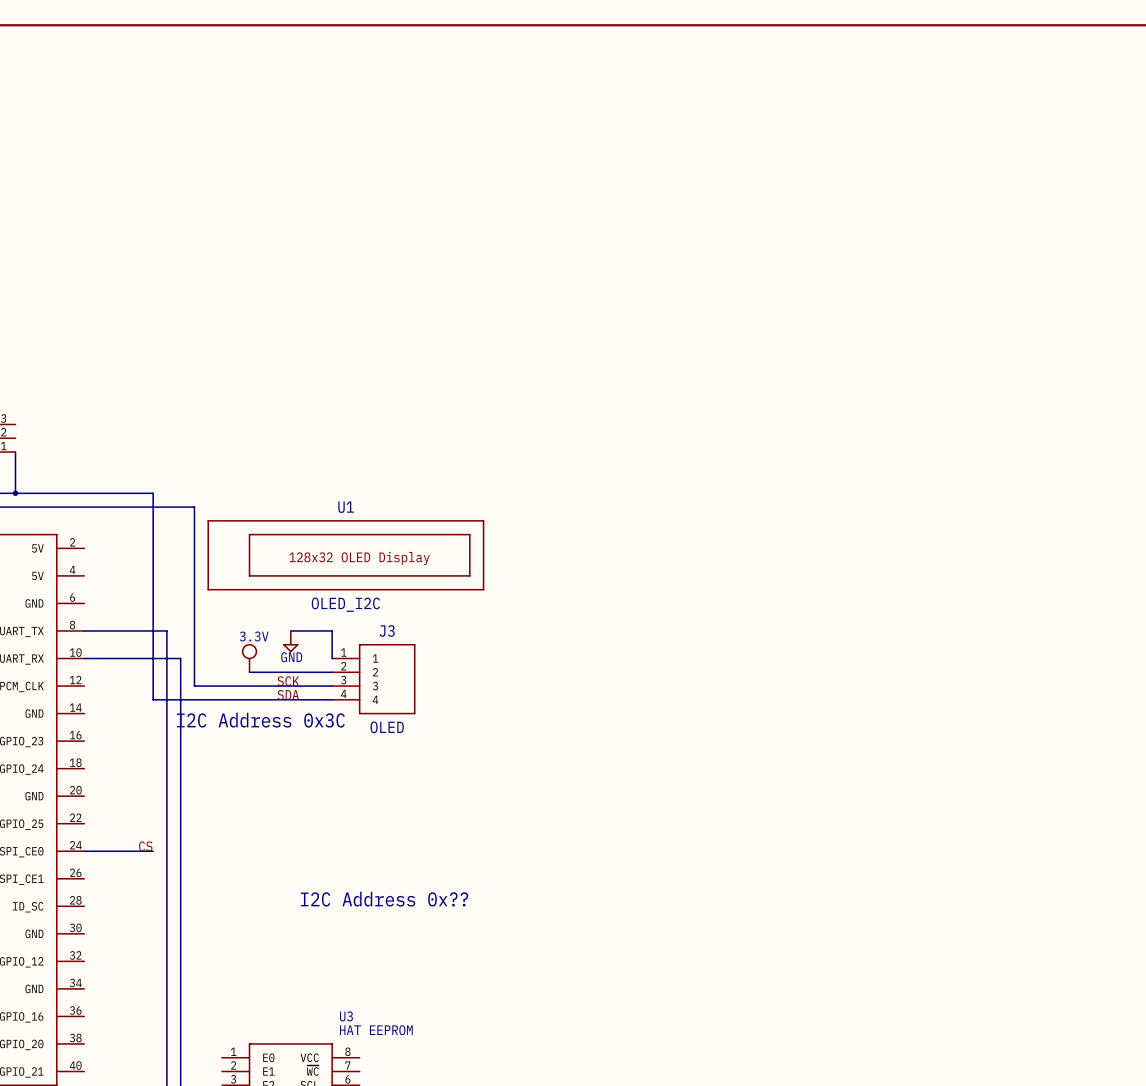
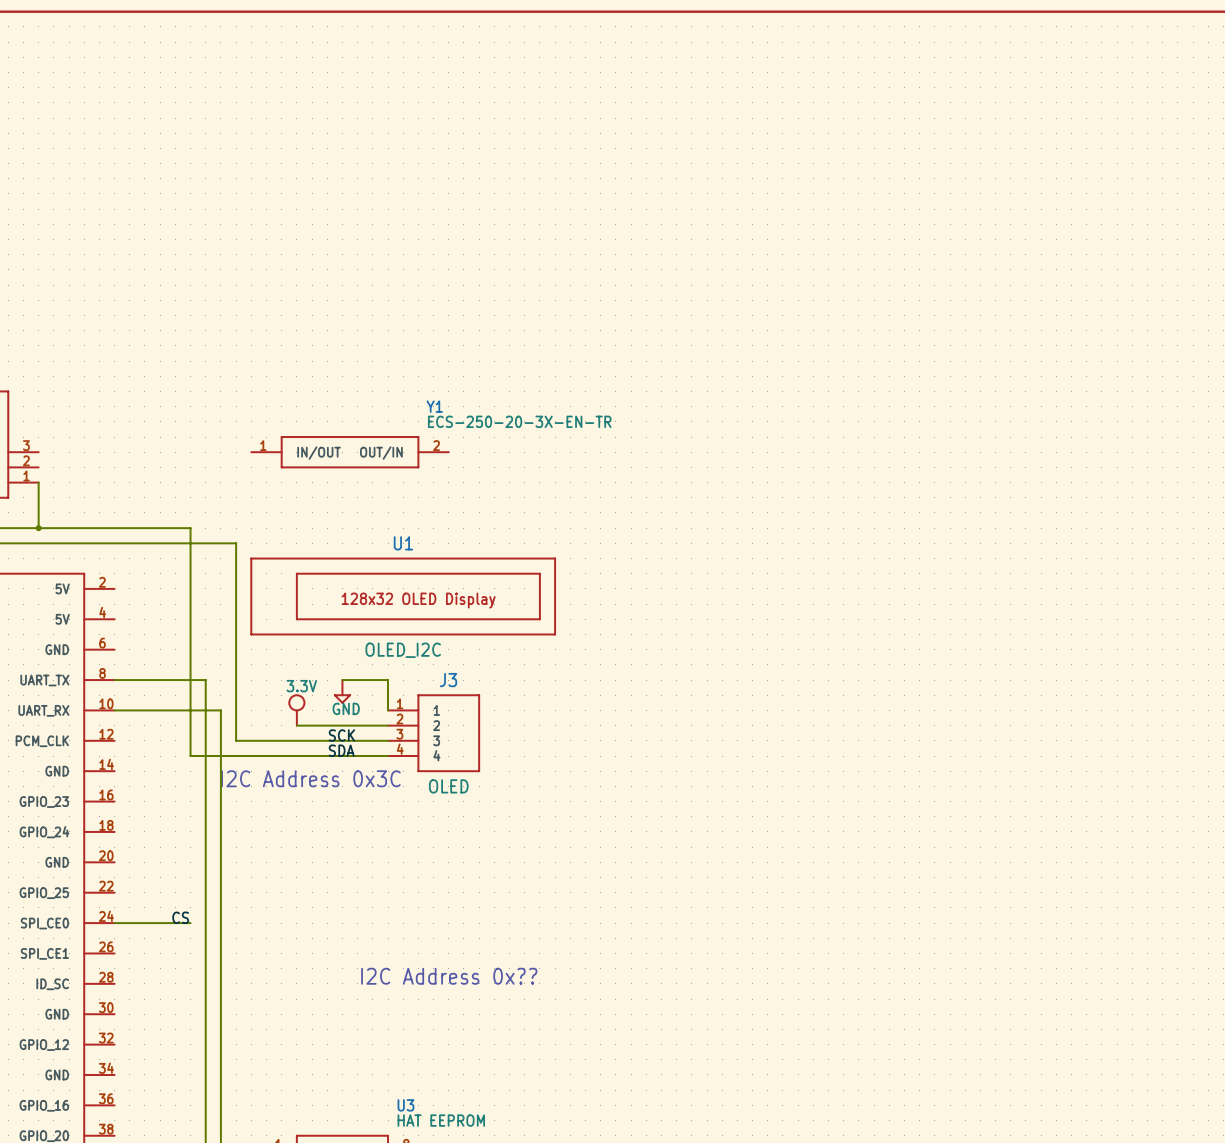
Y1: none -> ECS-250-20-3X-EN-TR (350, 452)

